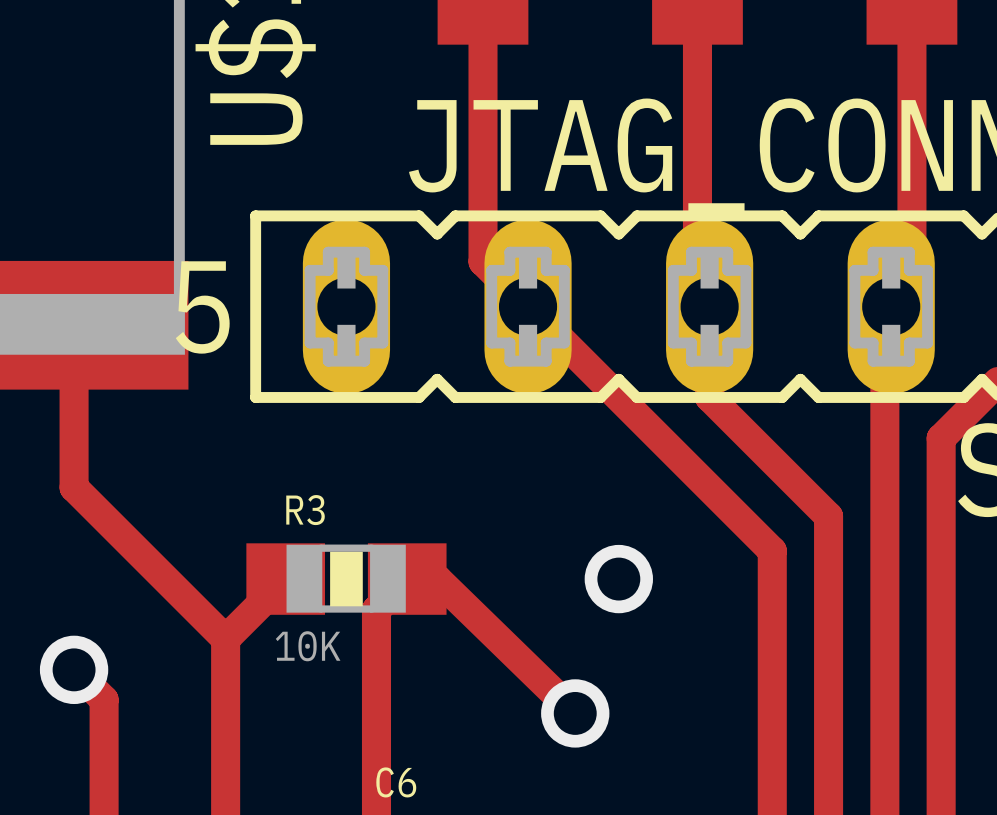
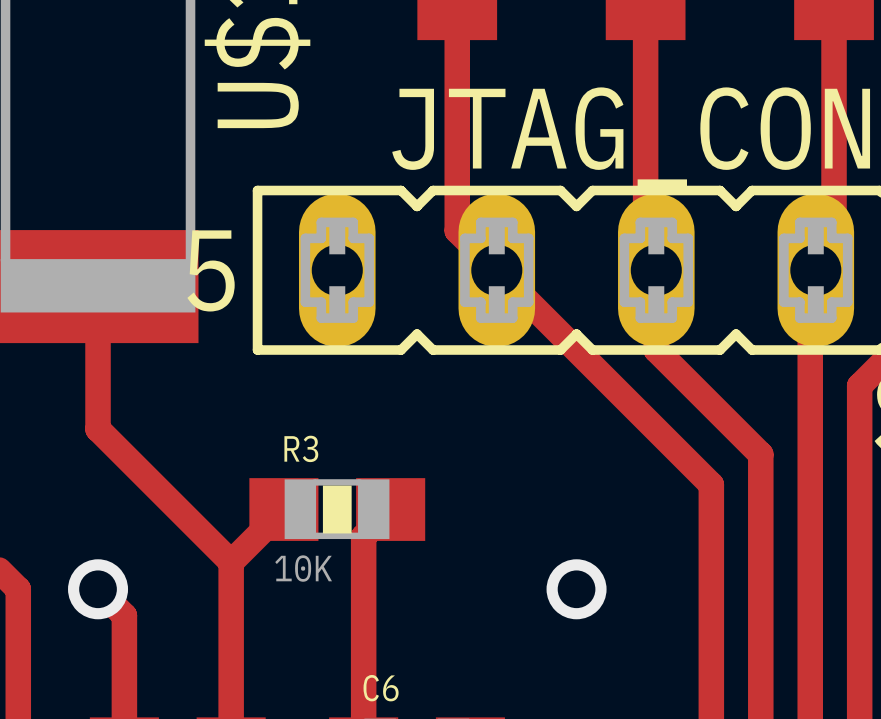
track: (407, 579) (437, 579) (575, 713) -> none
via: (618, 579) -> none
via position: (575, 713) -> (576, 589)

